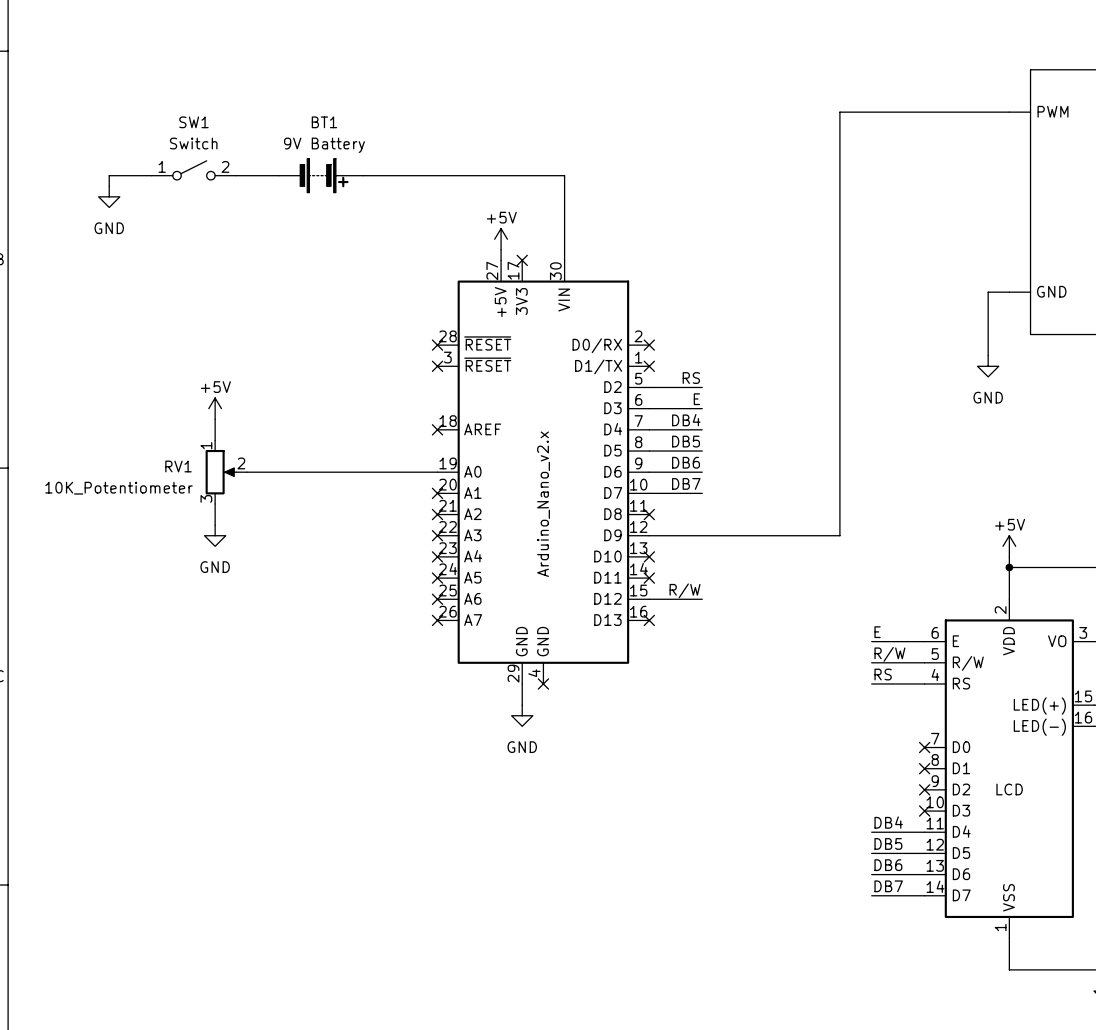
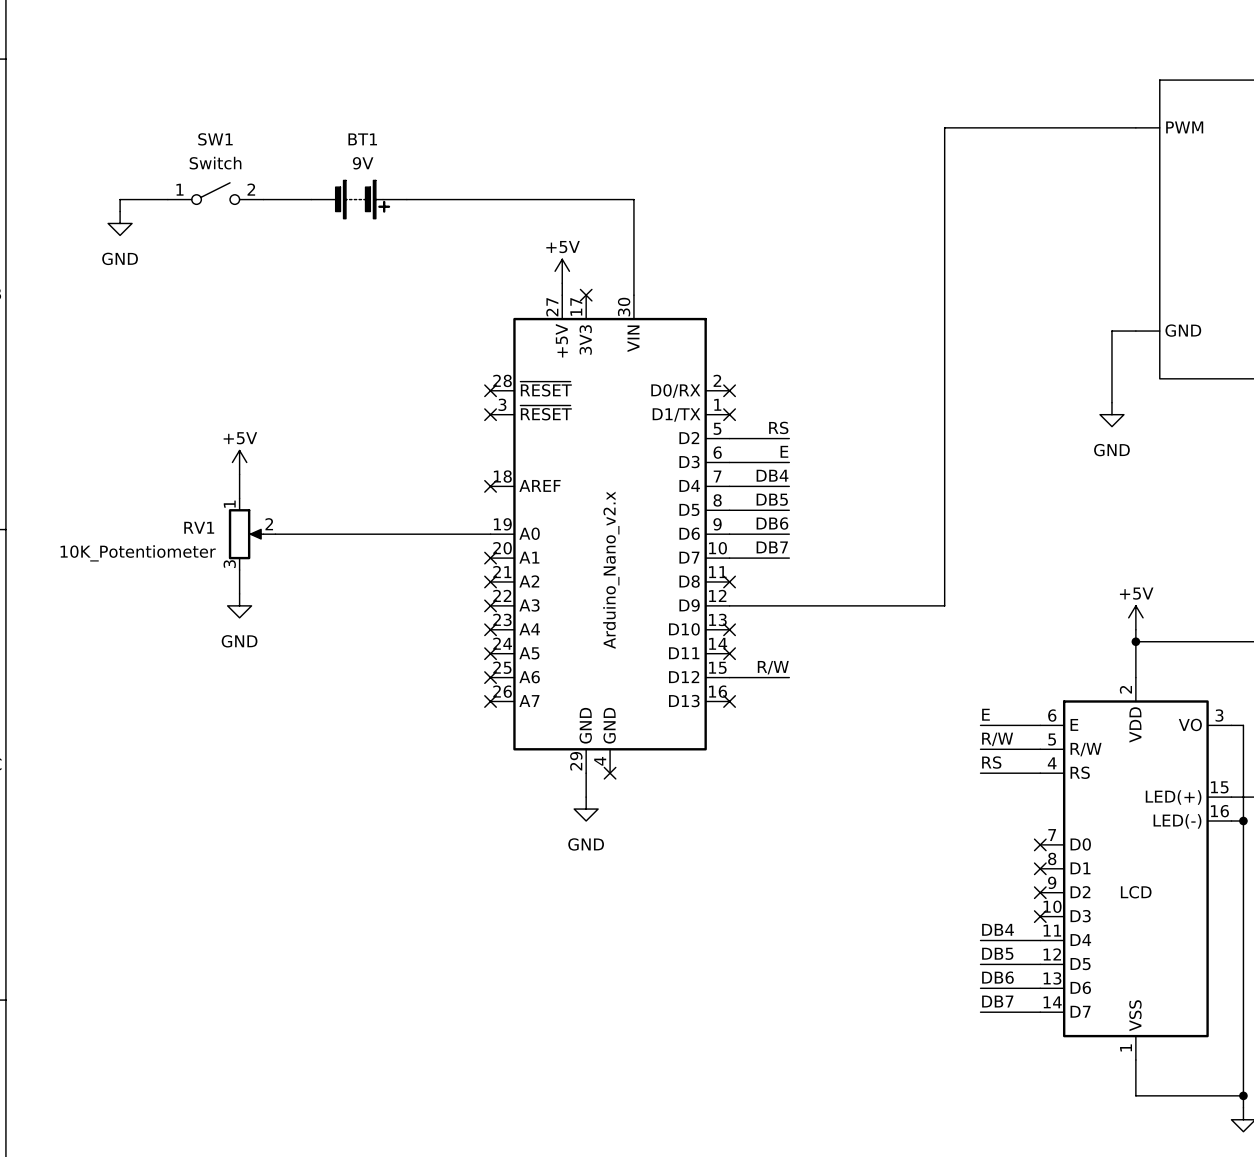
BT1 value: 9V Battery (324, 145) -> 9V (363, 163)

